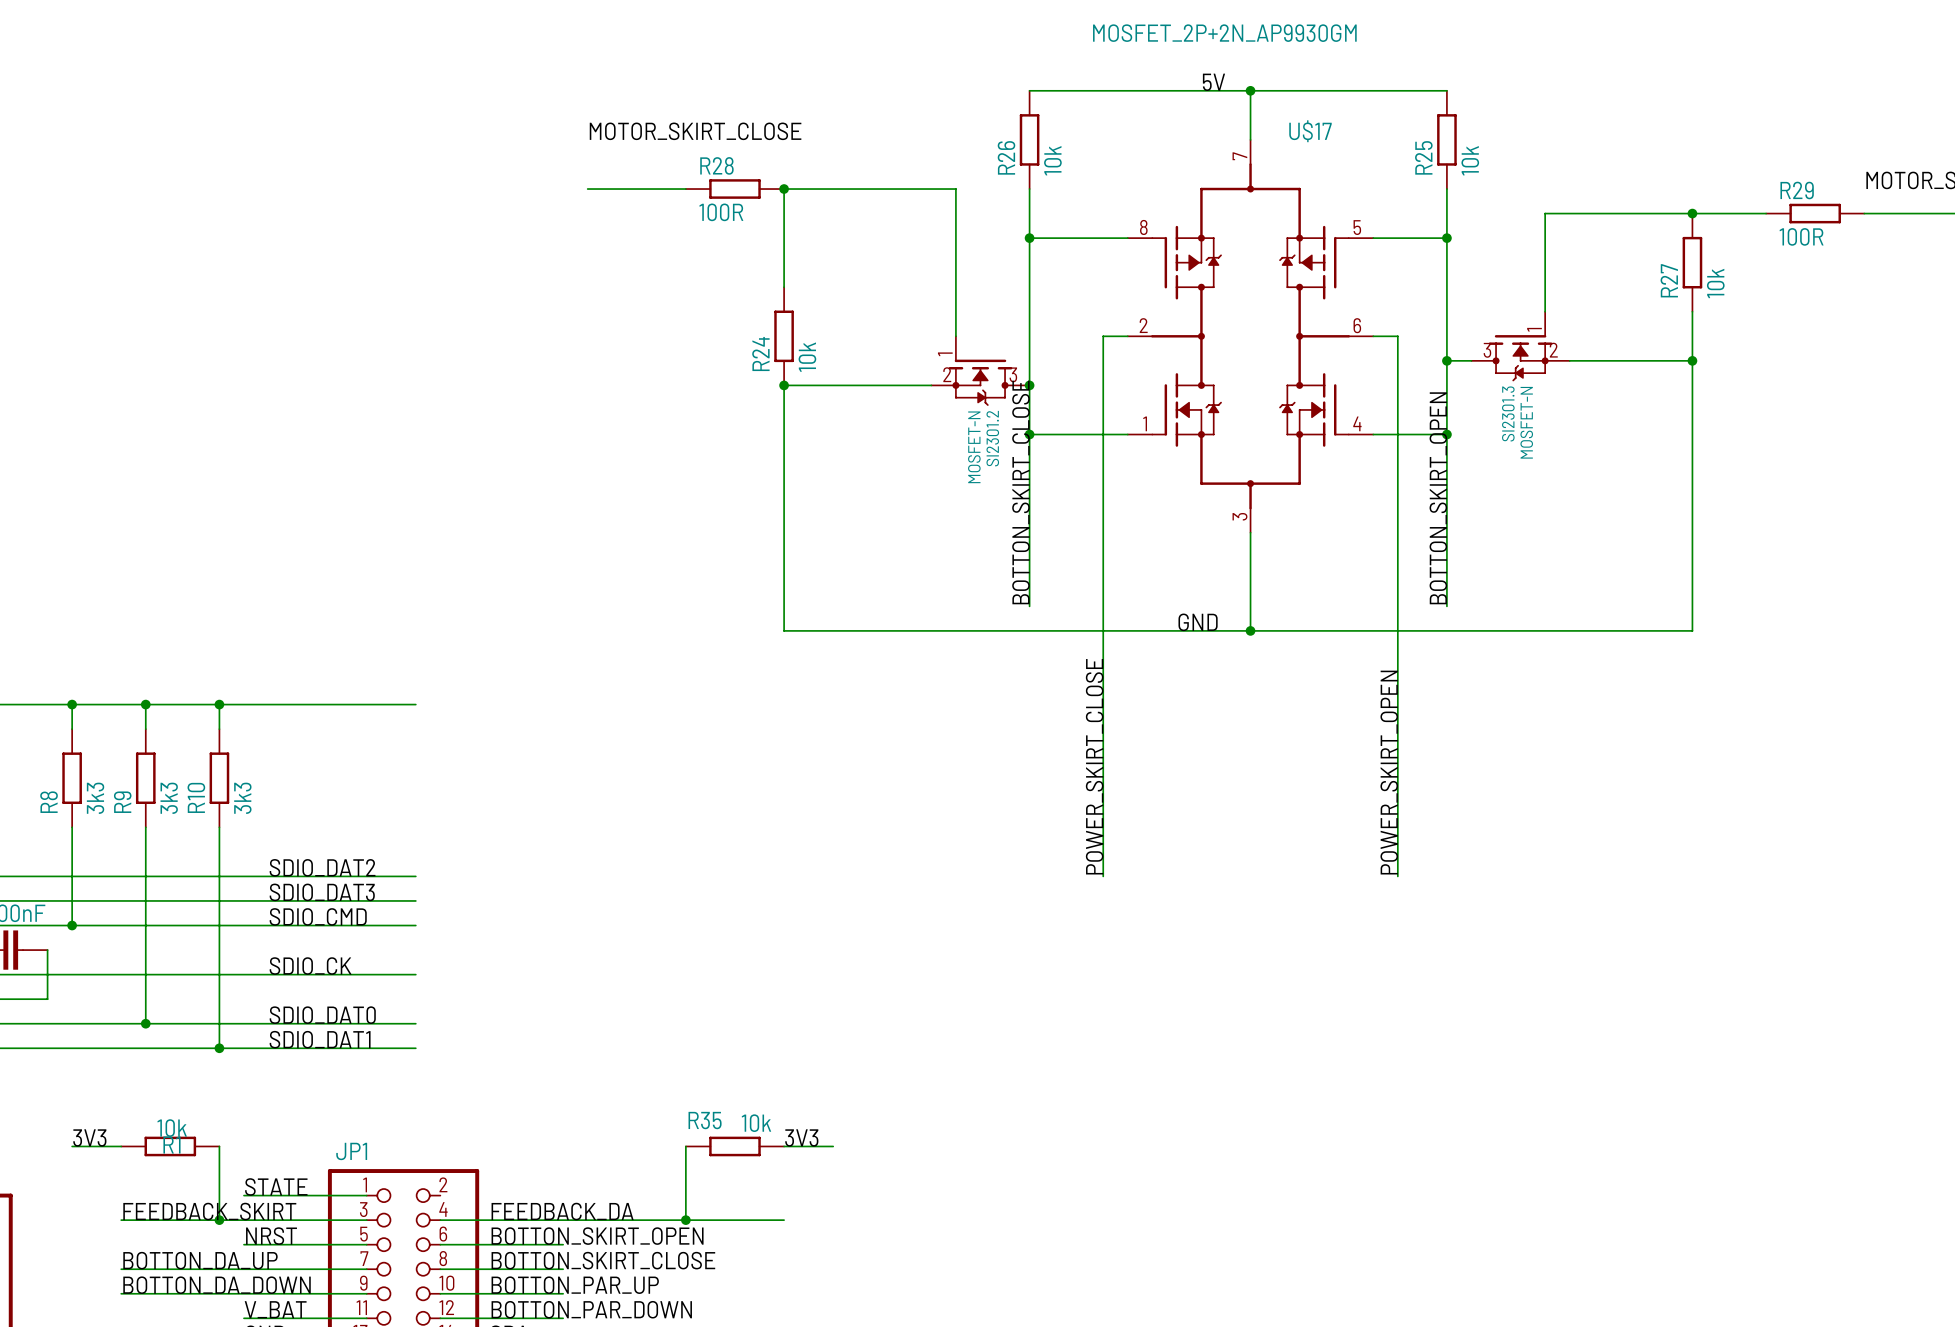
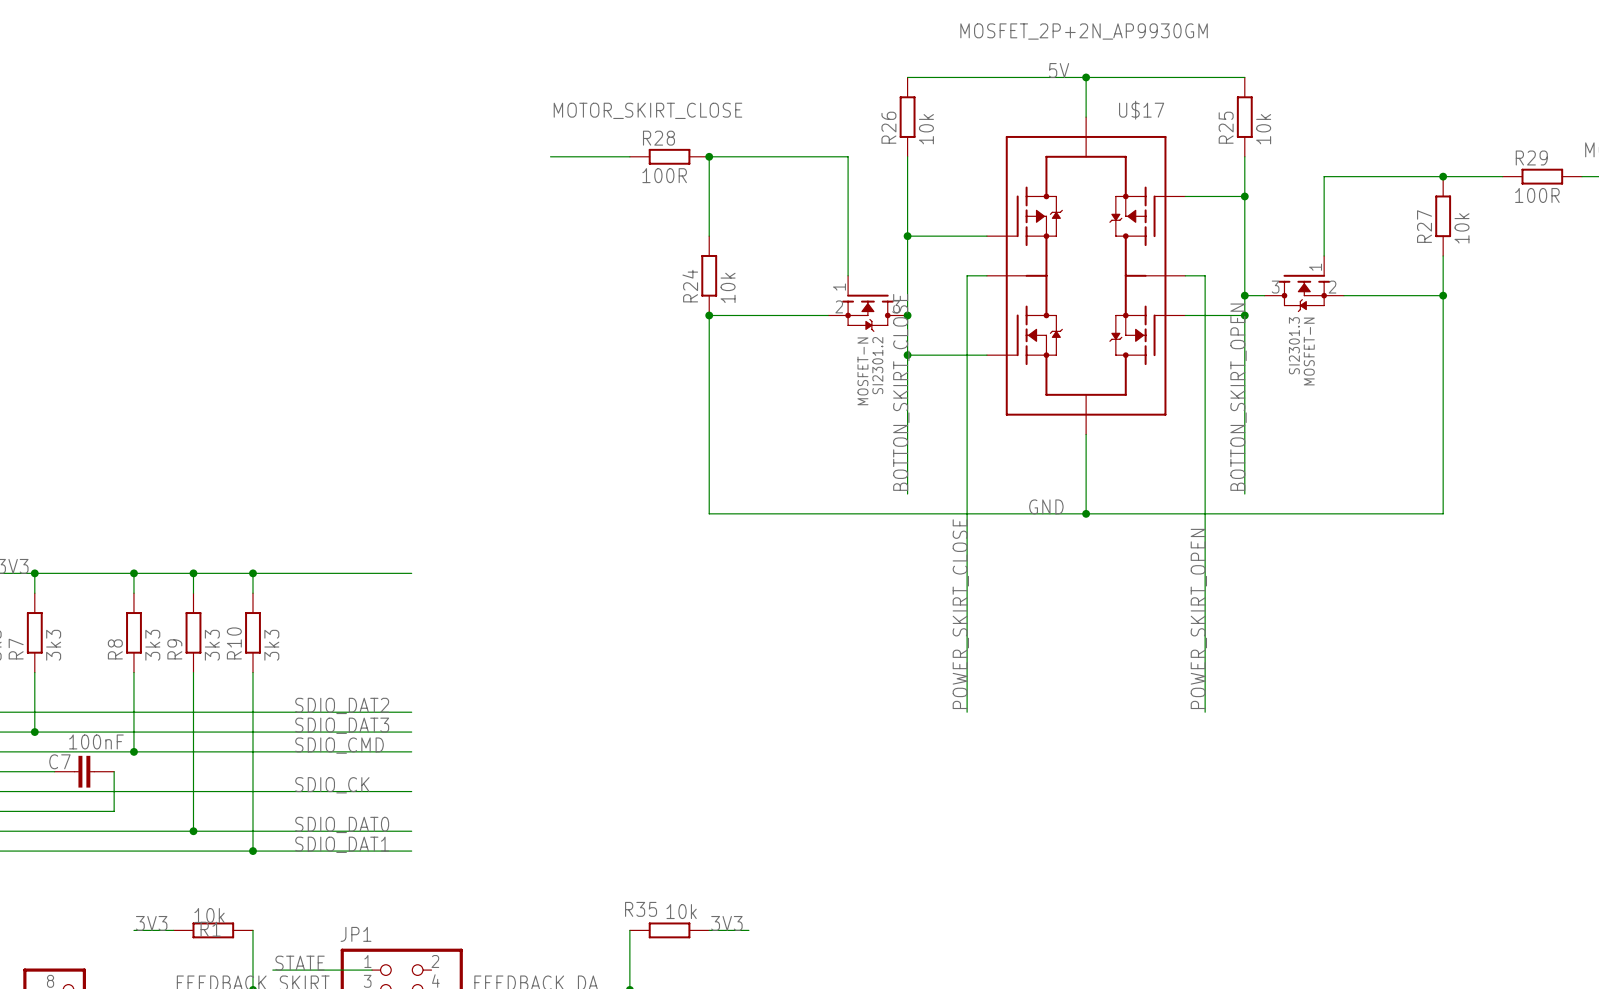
U$17 symbol: [1127, 139, 1374, 533] -> [986, 117, 1186, 435]
wire: (1029, 238) (1127, 238) -> (907, 236) (986, 236)
junction position: (1029, 238) -> (907, 236)
wire: (1373, 434) (1446, 434) -> (1185, 315) (1244, 315)
junction position: (1446, 434) -> (1244, 315)

